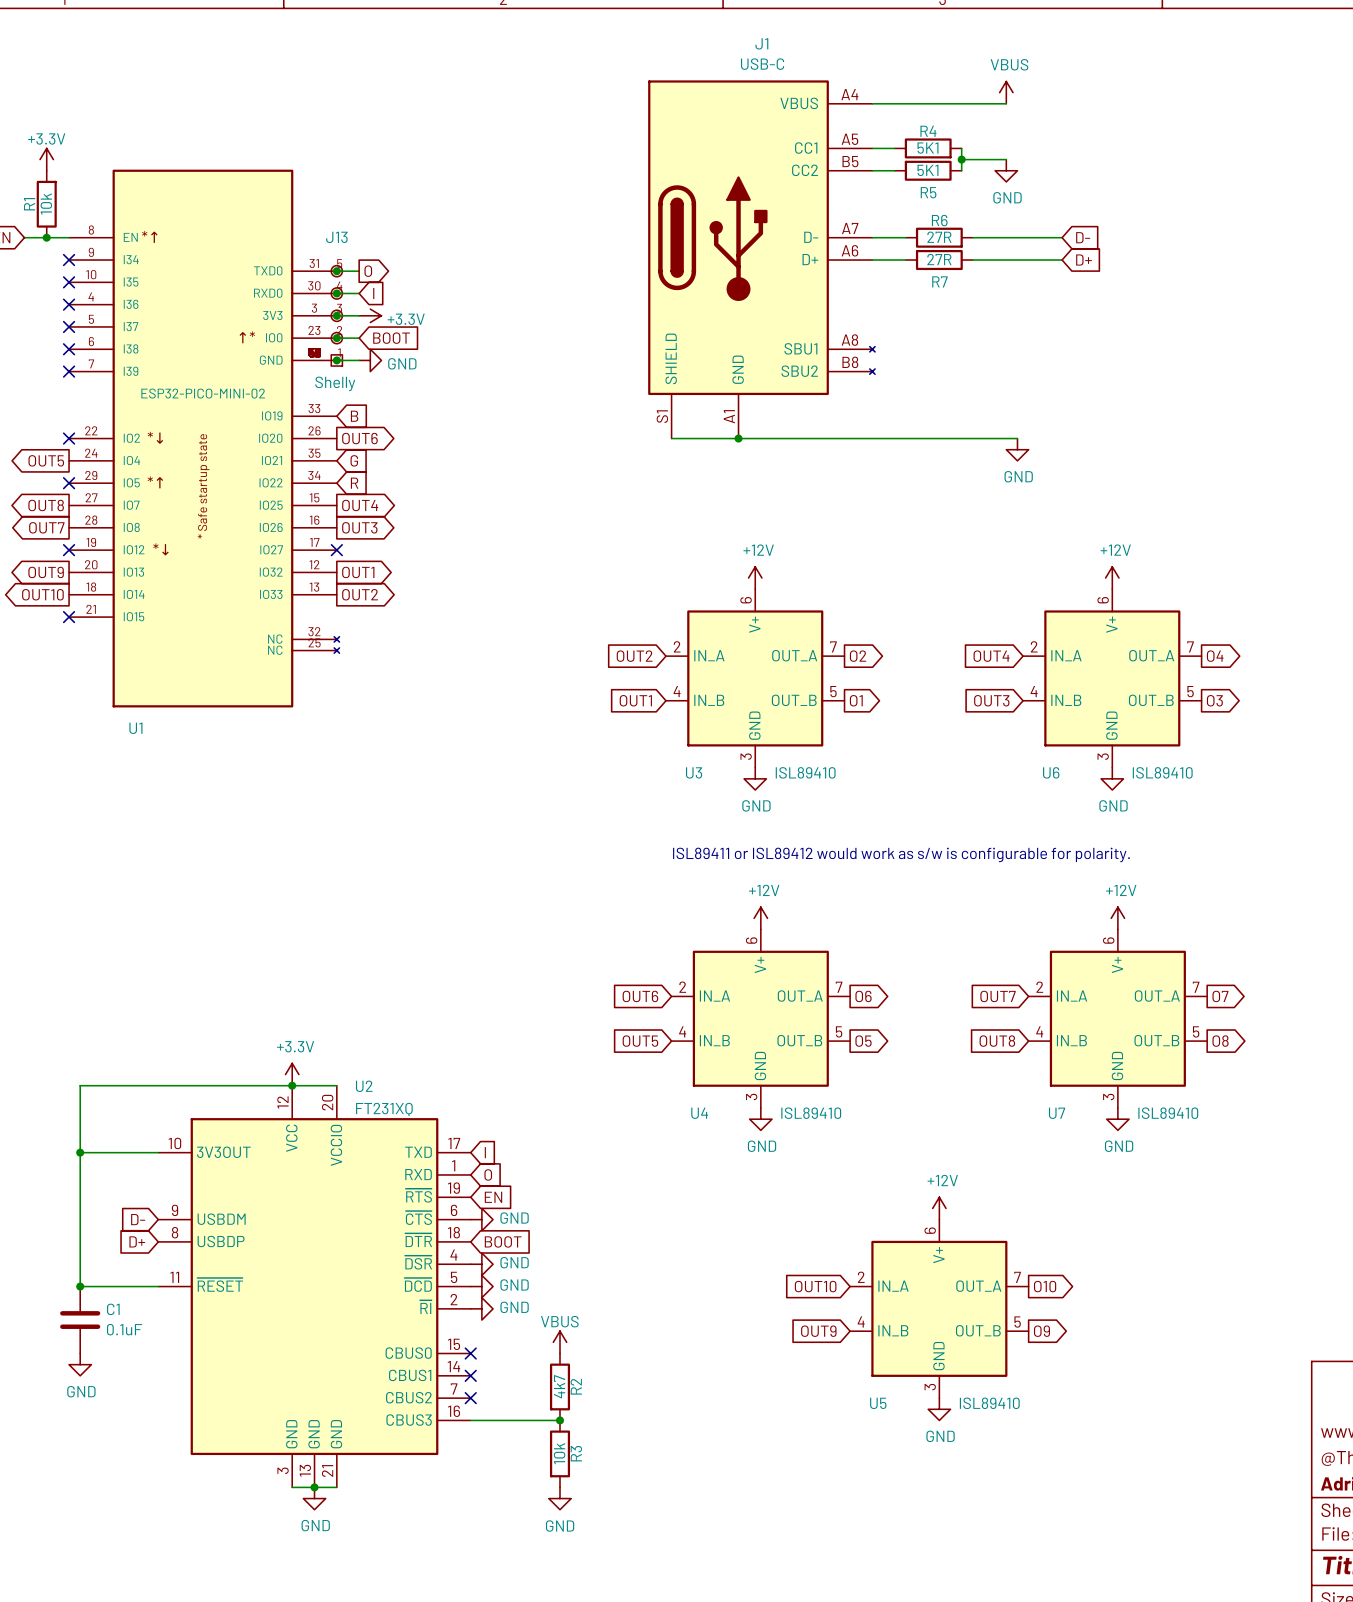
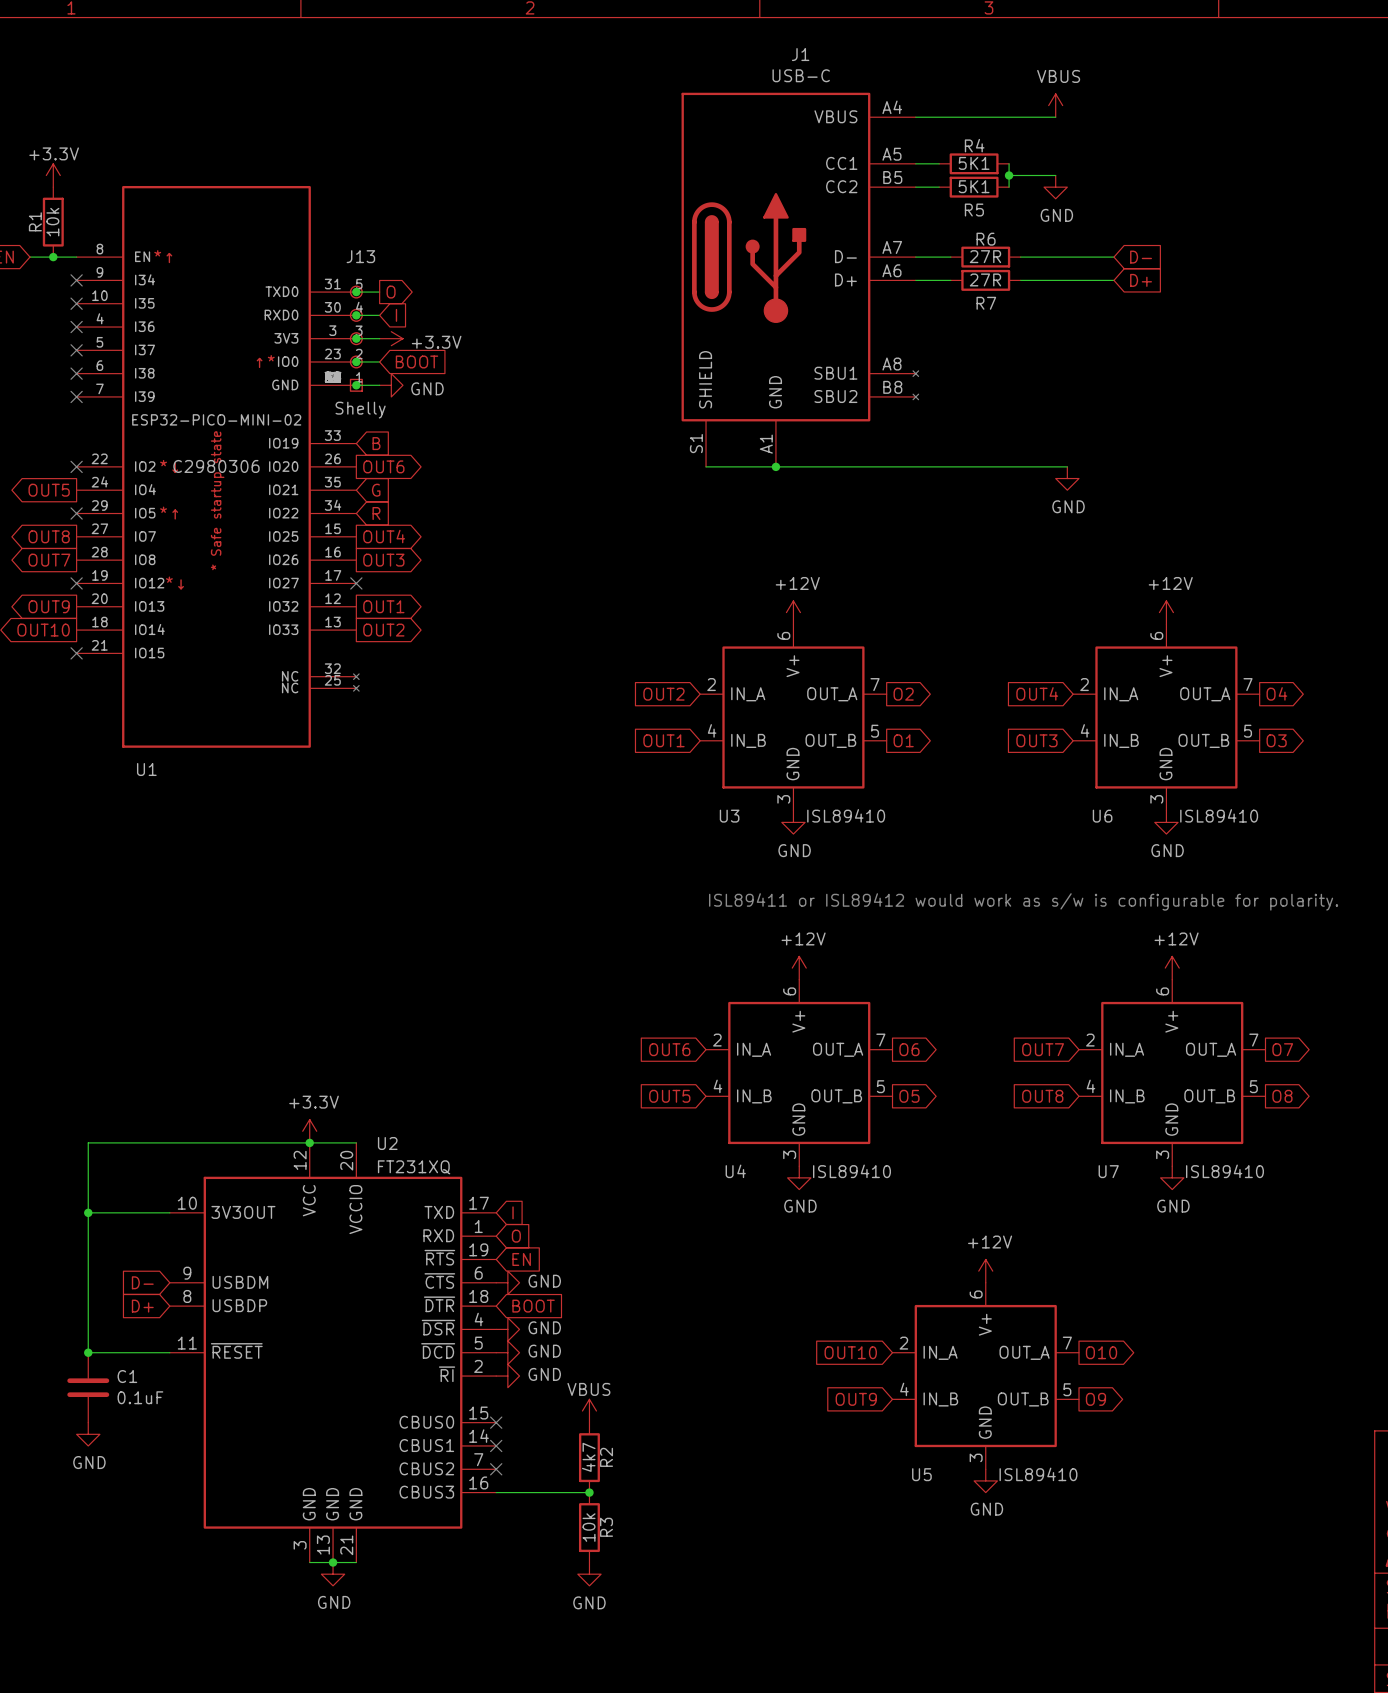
U1 text: none -> C2980306 (216, 466)

